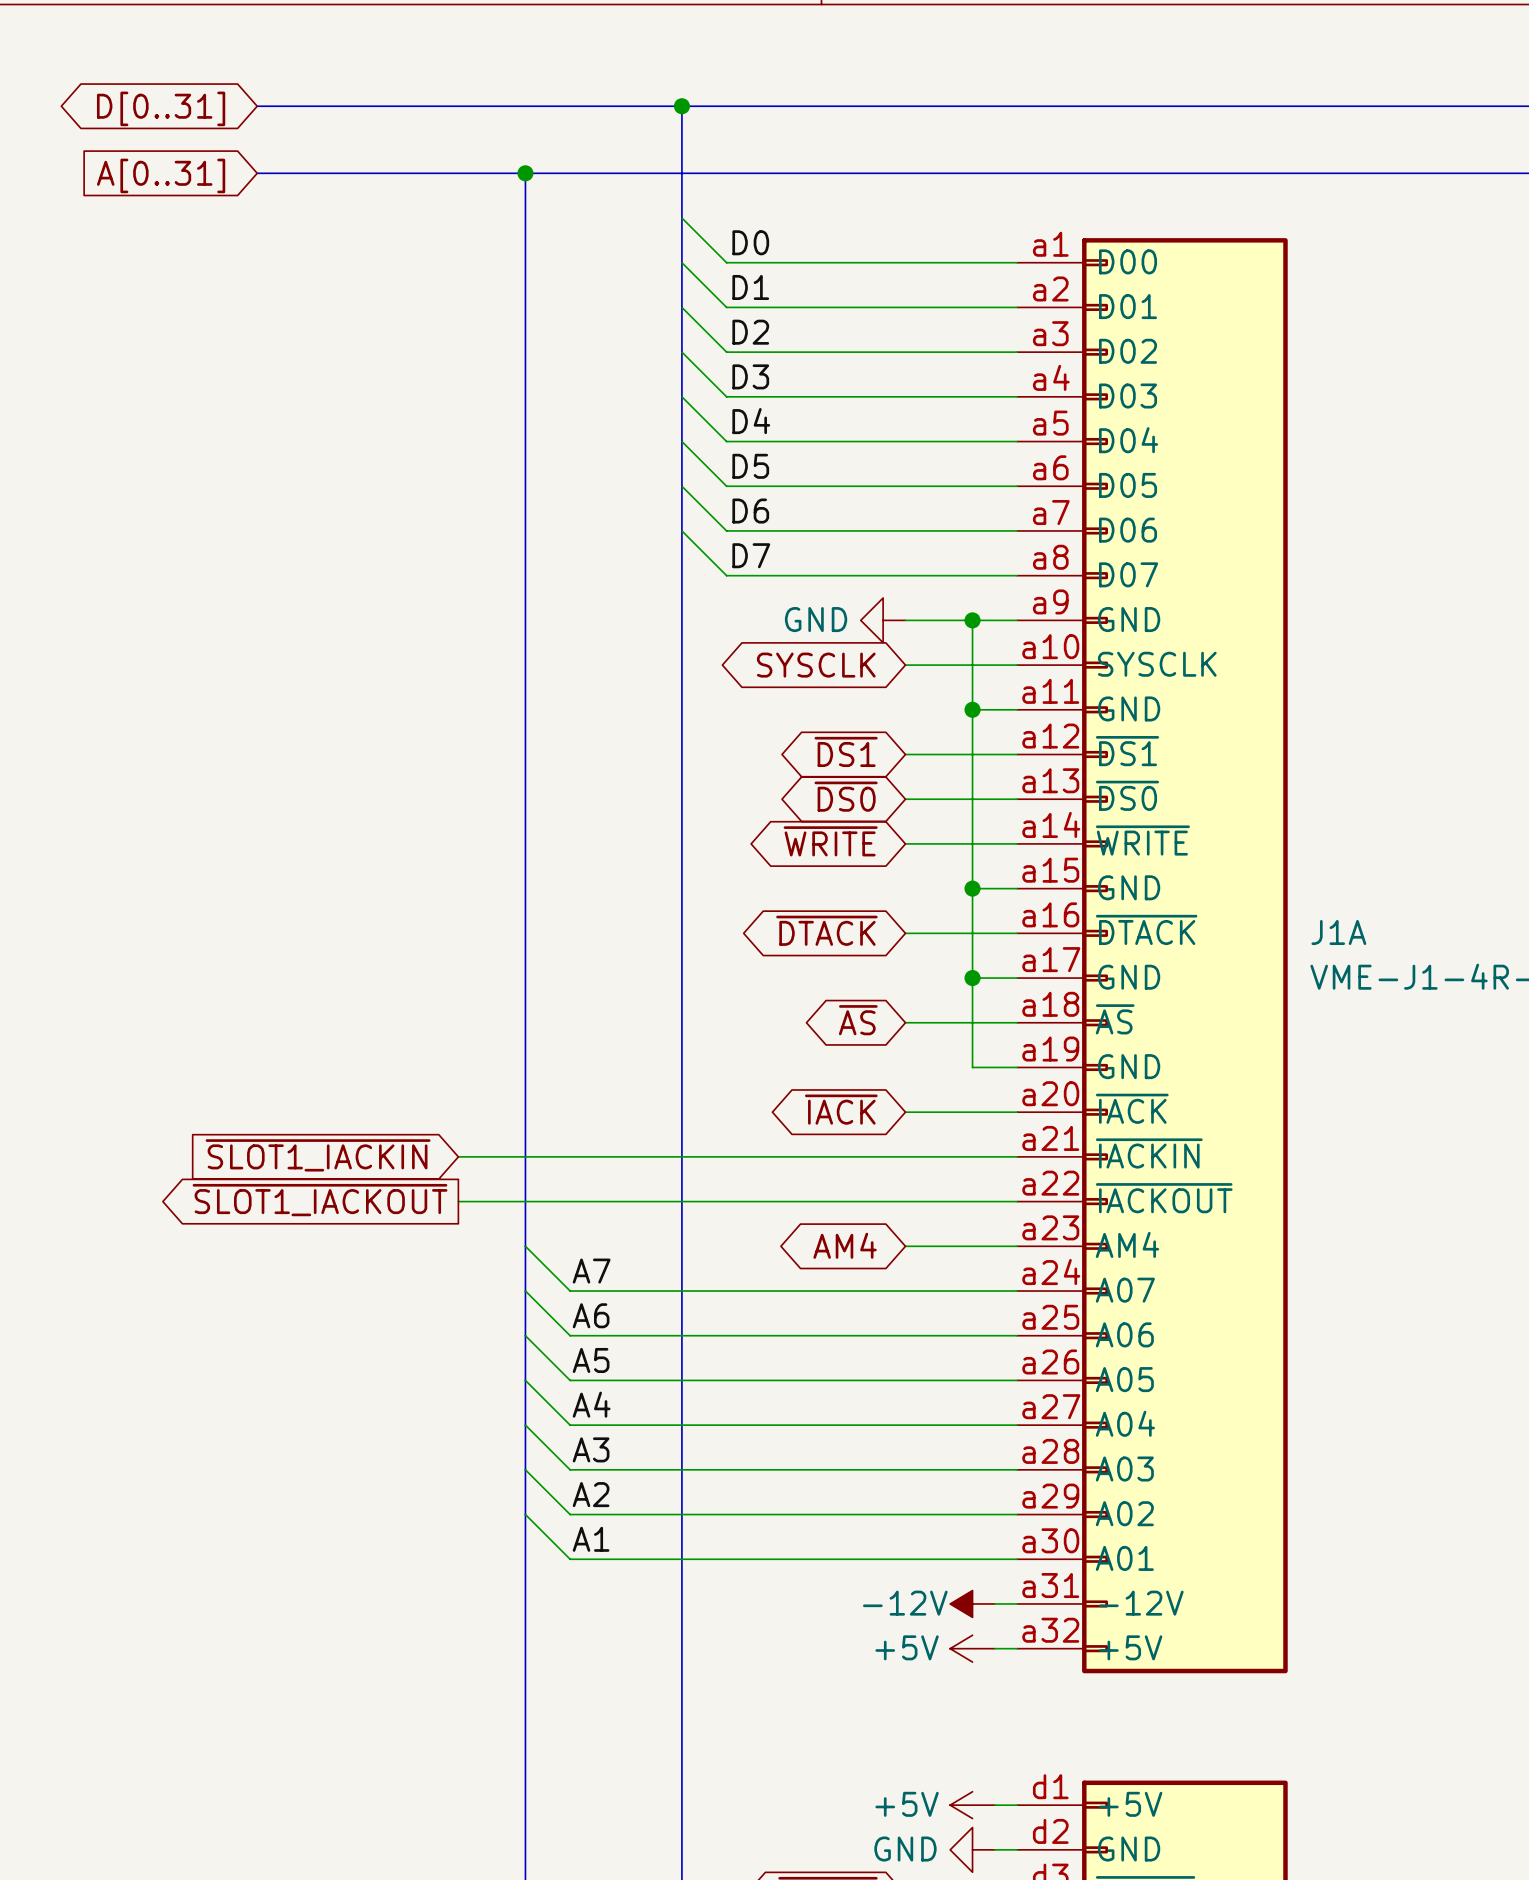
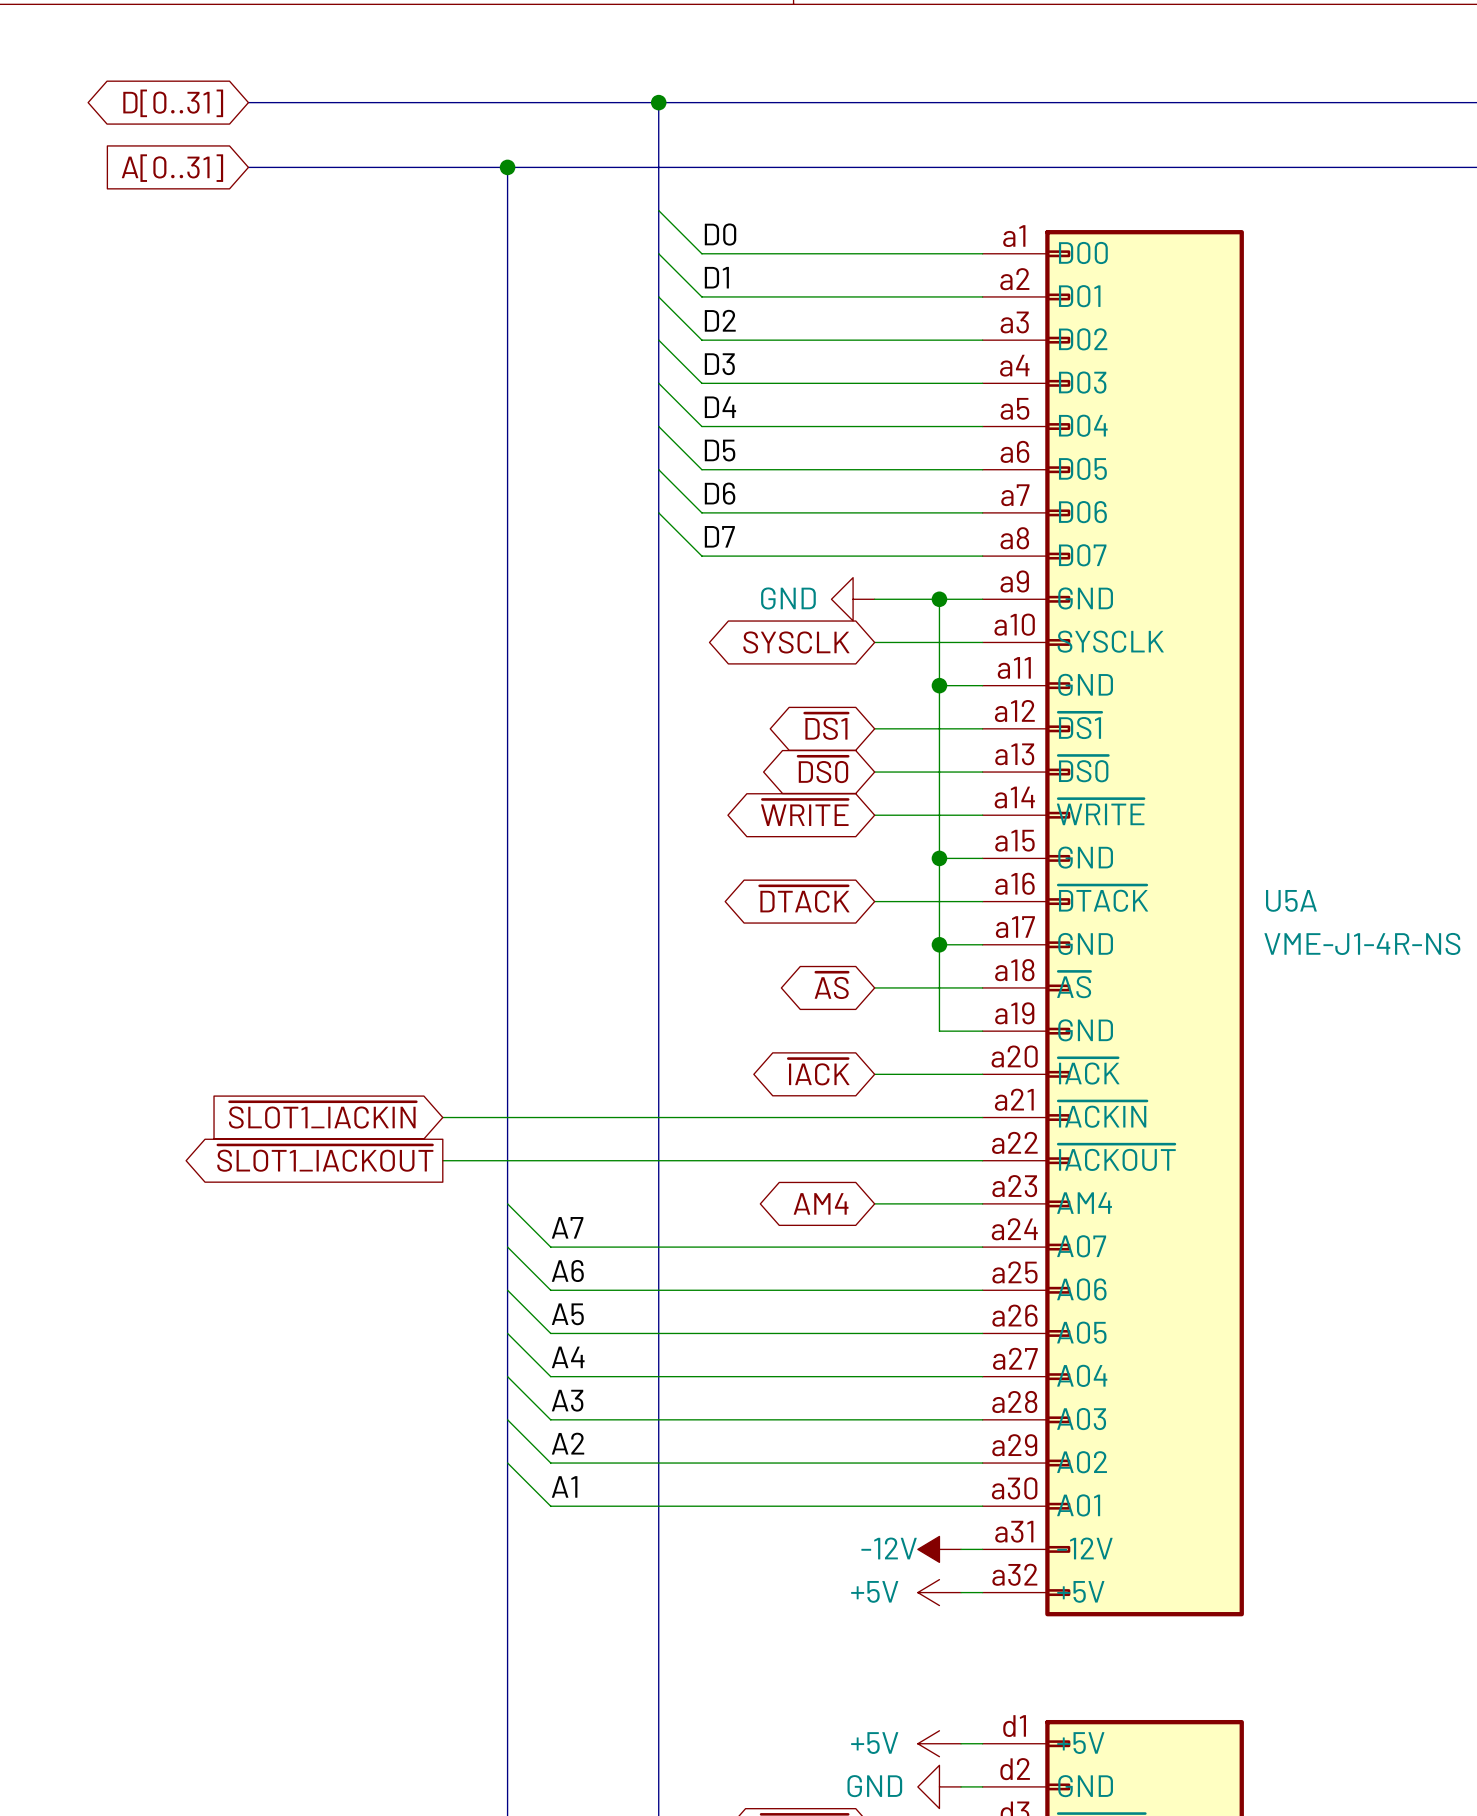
J1A name: J1A (1338, 932) -> U5A (1291, 900)

